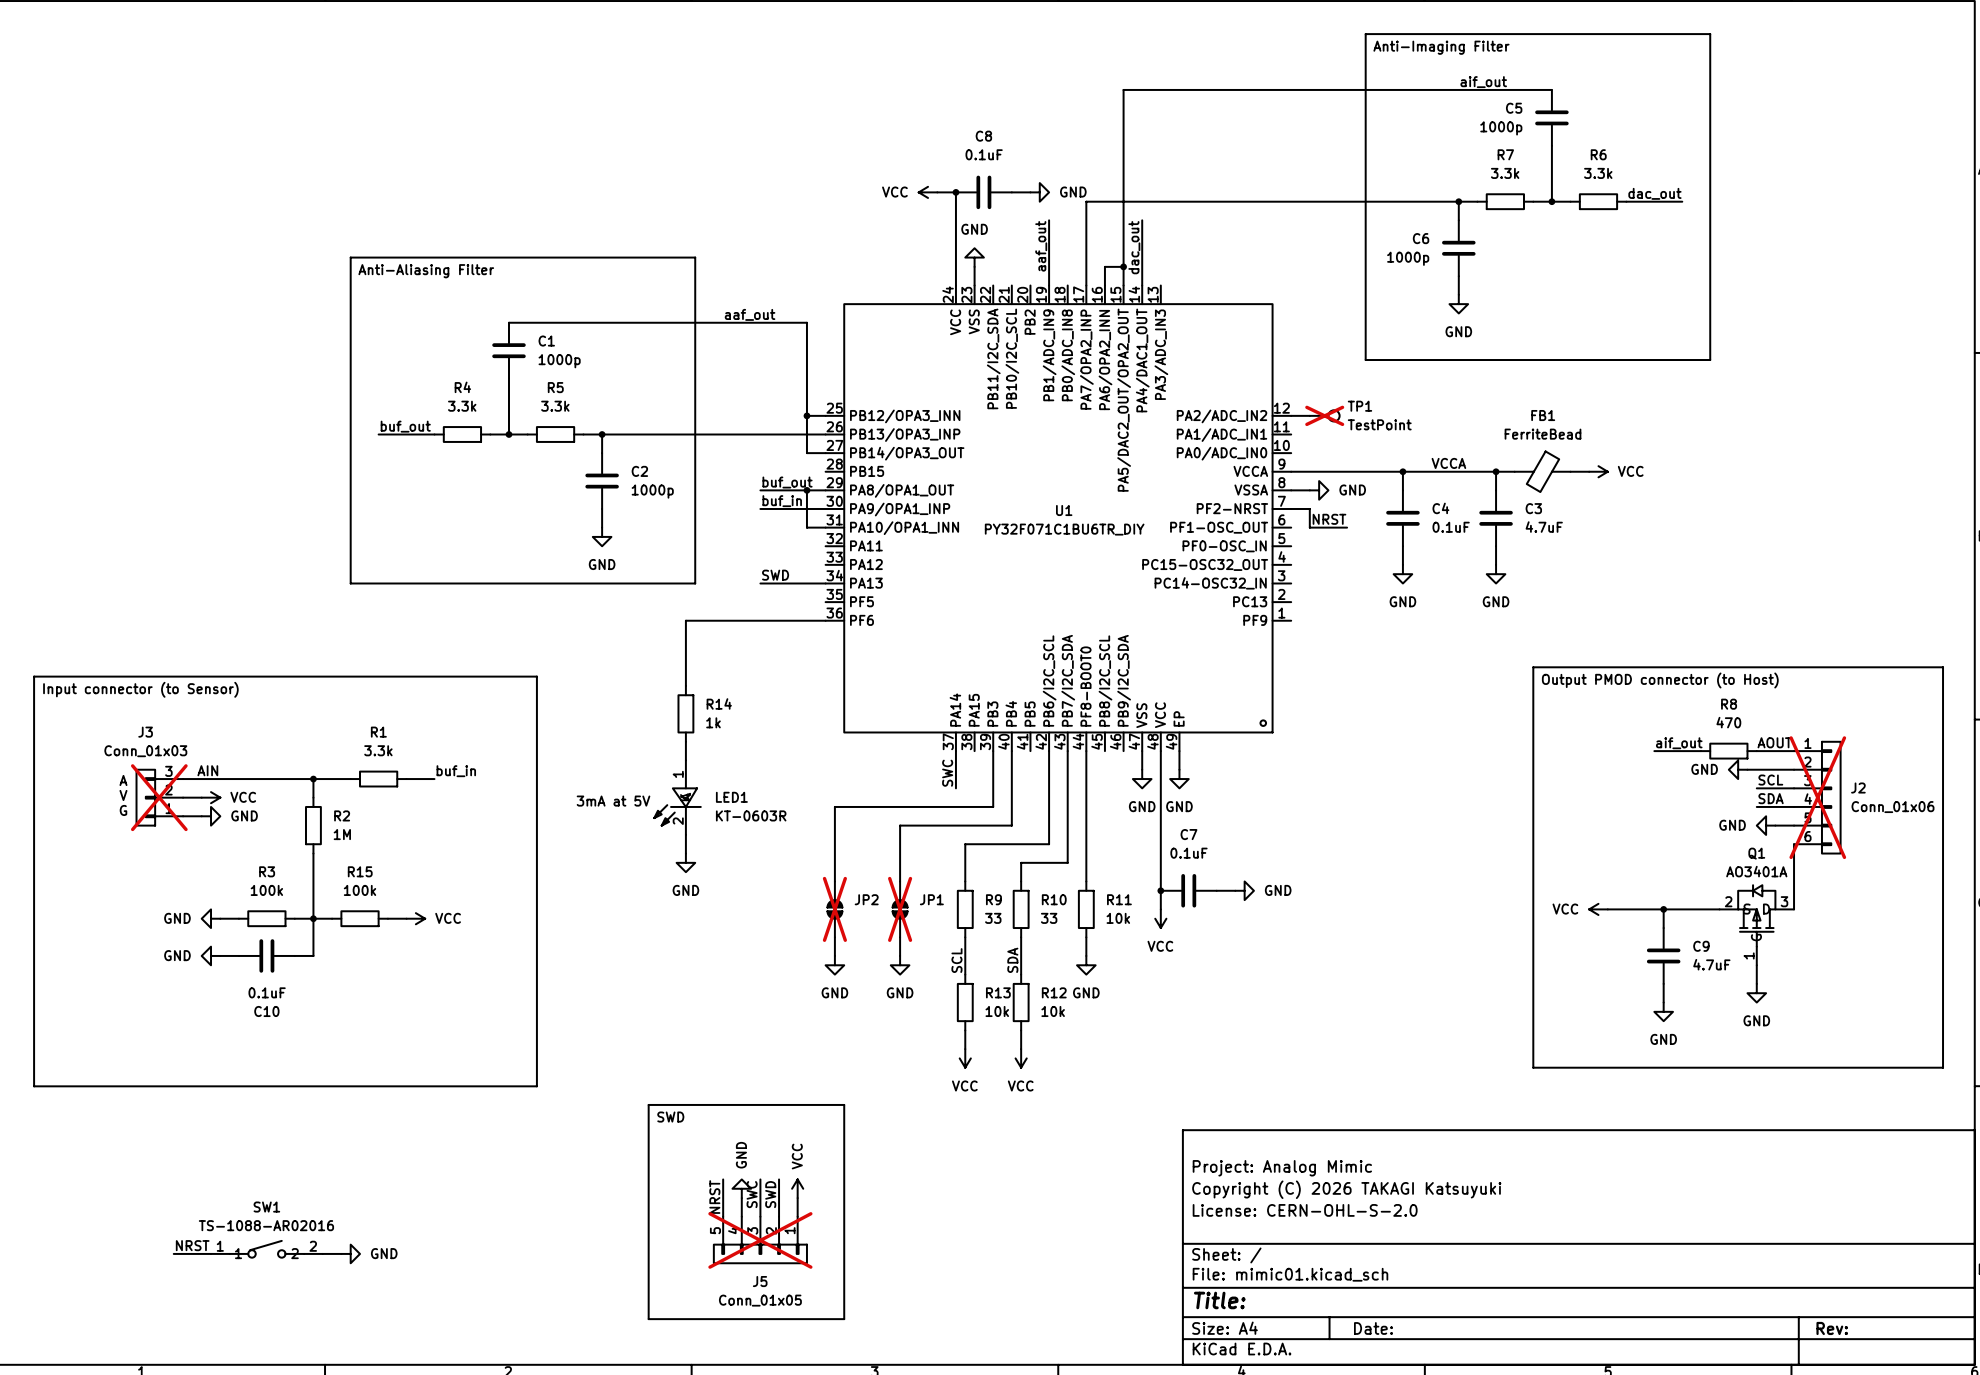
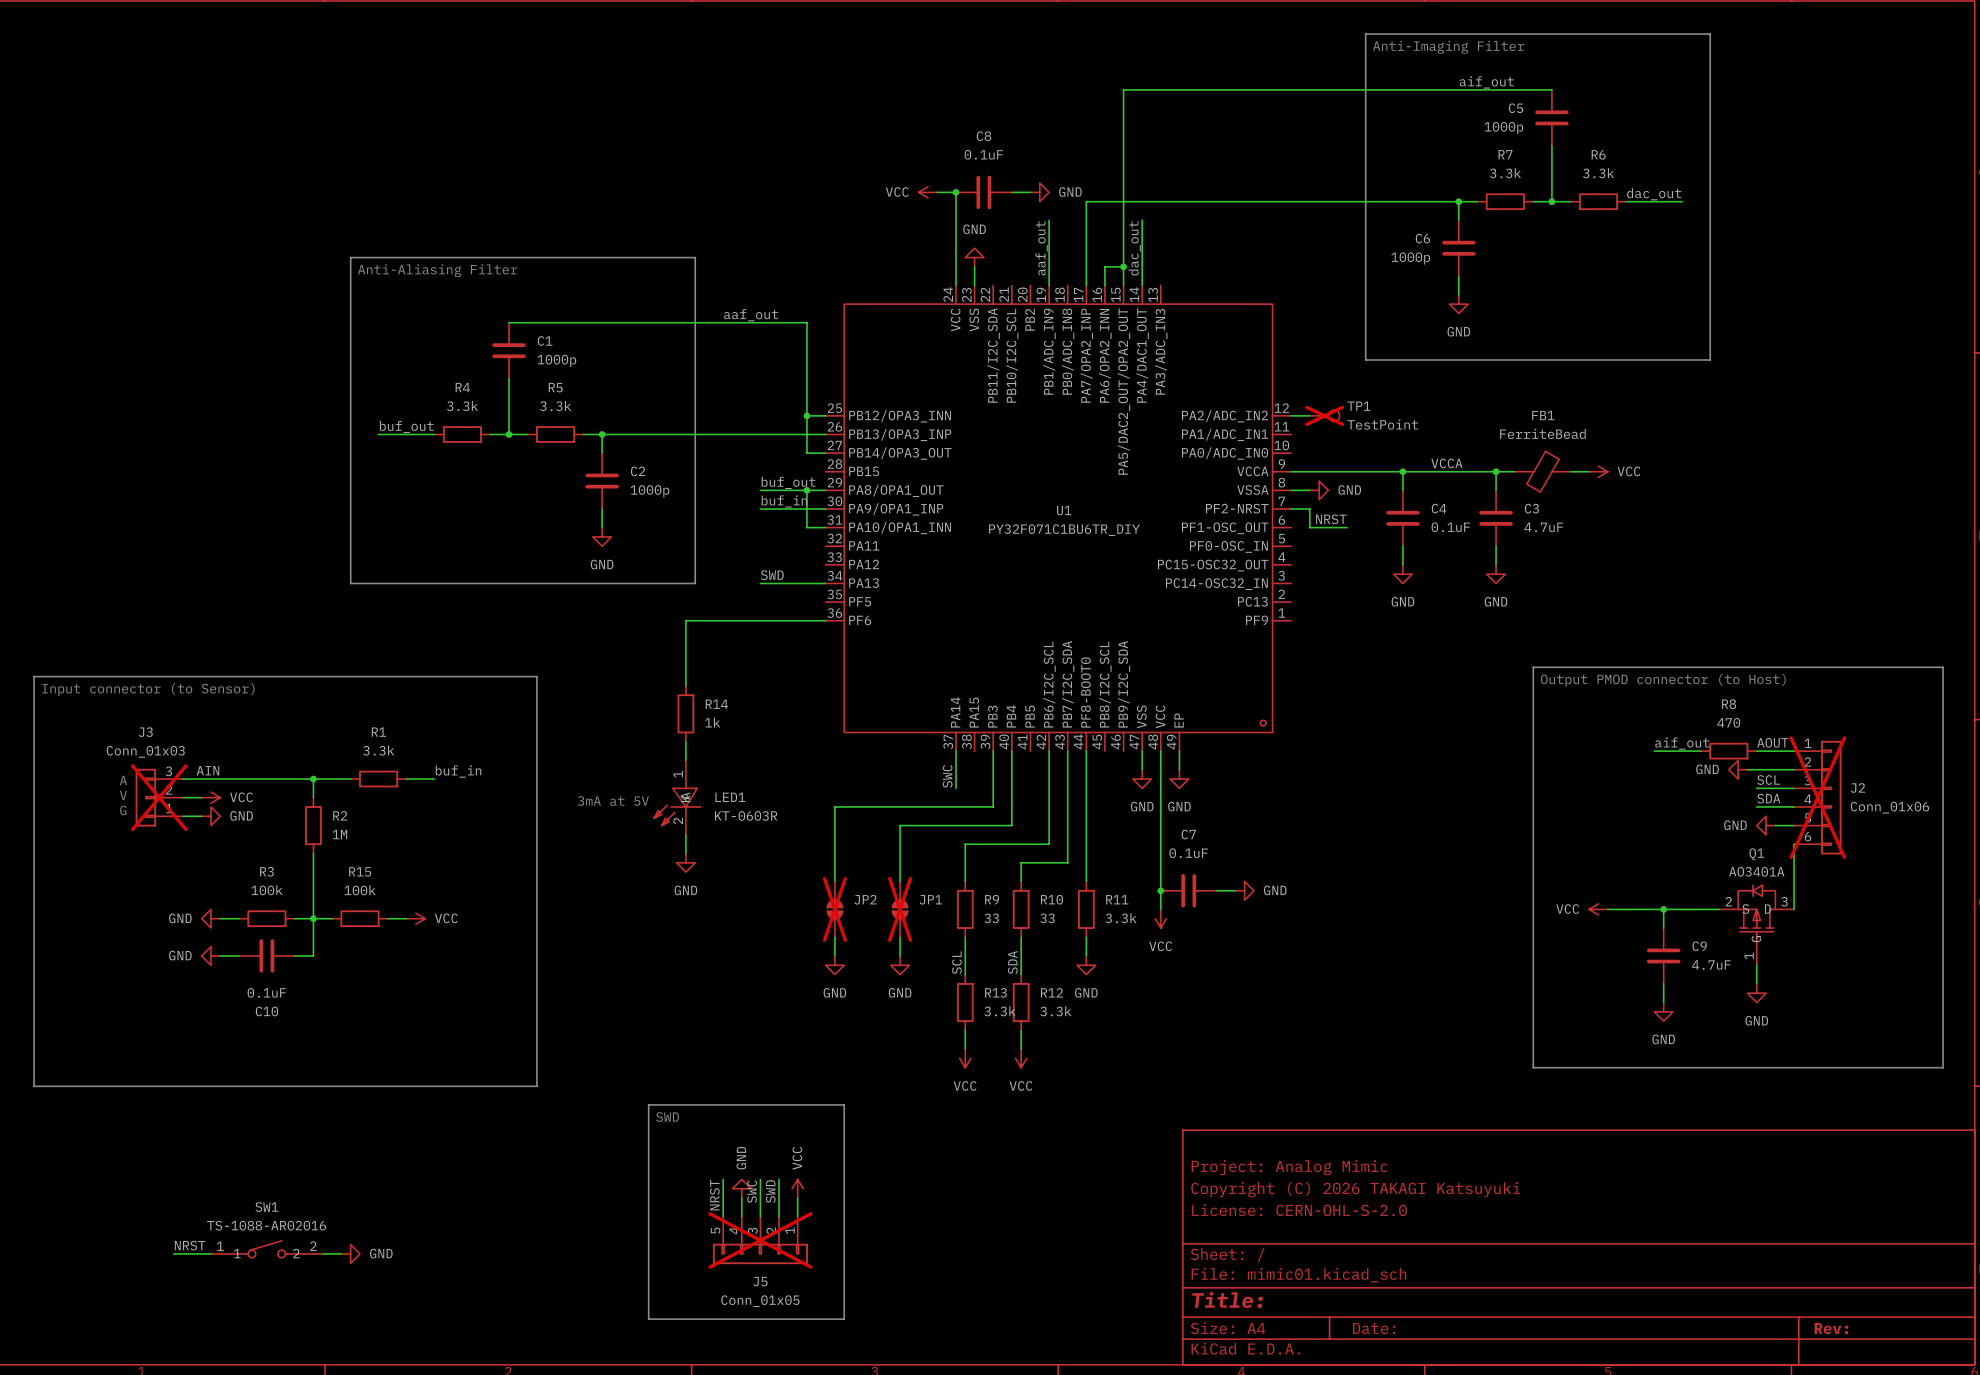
R11 value: 10k (1118, 918) -> 3.3k (1121, 918)
R13 value: 10k (997, 1011) -> 3.3k (1000, 1011)
R12 value: 10k (1053, 1011) -> 3.3k (1055, 1011)

